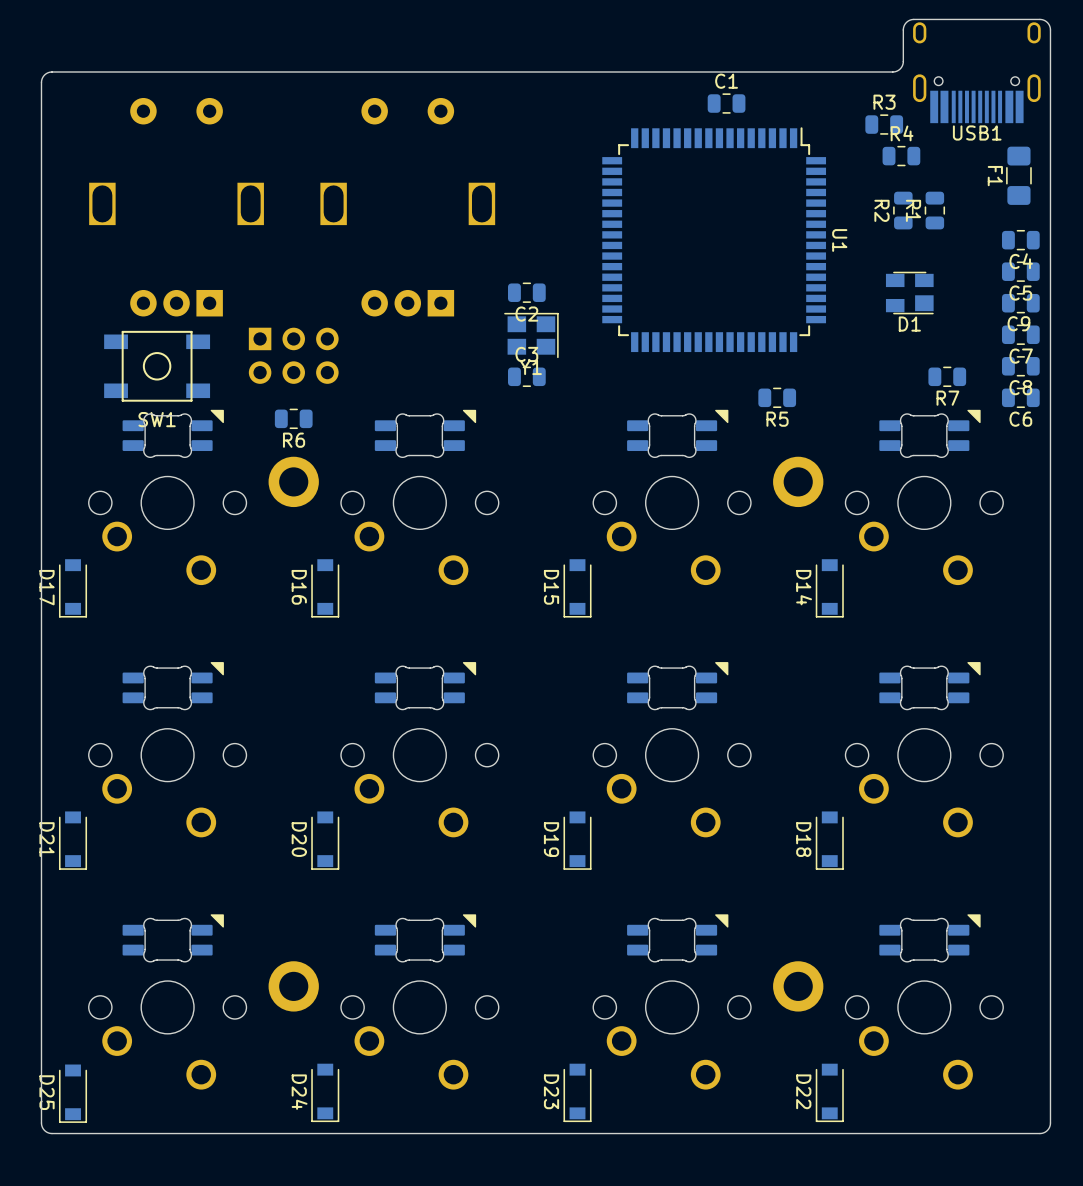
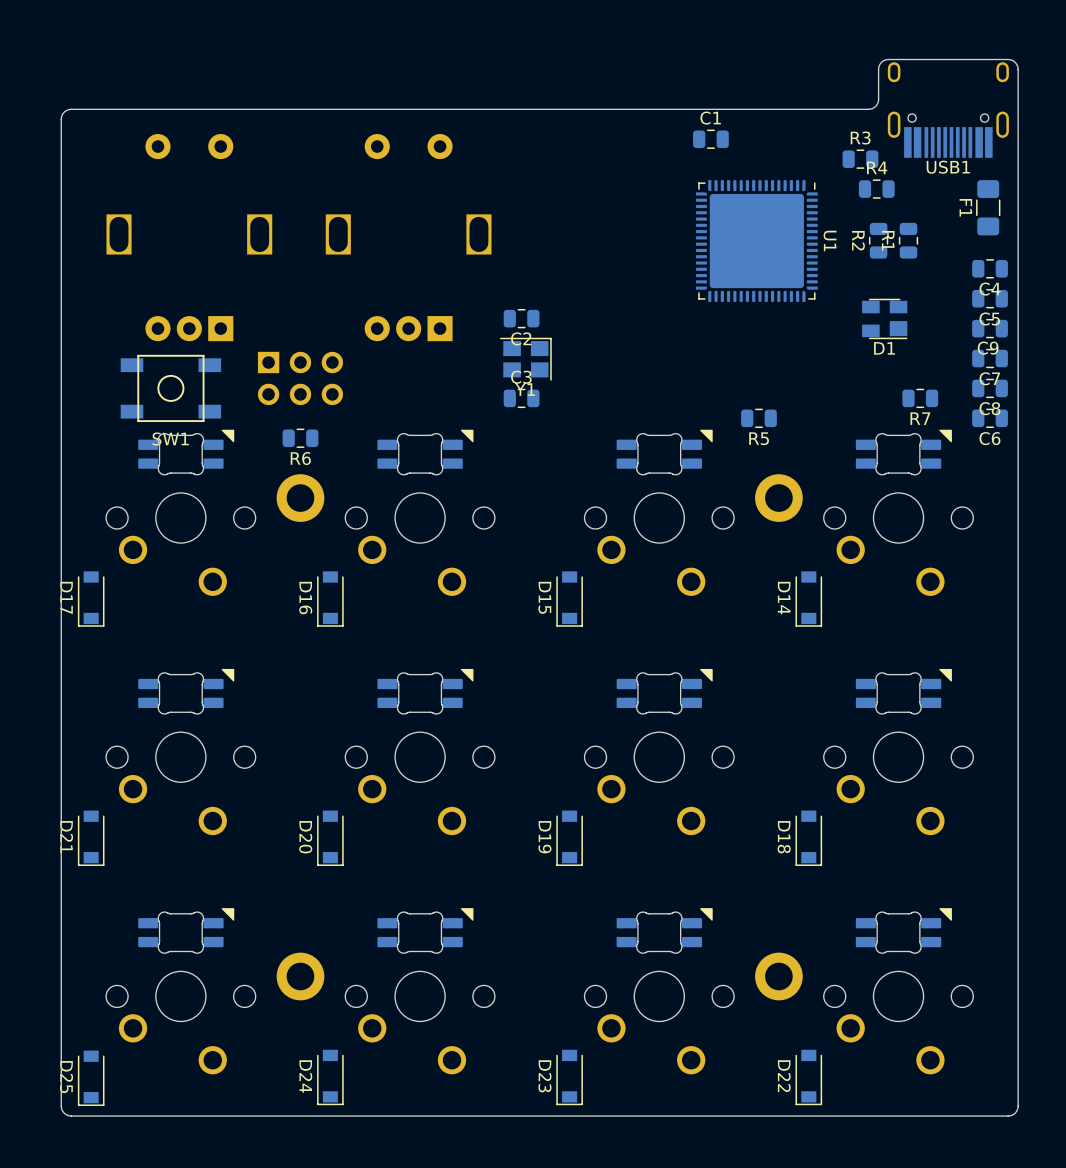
U1 footprint: [602, 127, 827, 353] -> [695, 180, 818, 302]
U1 name position: U1 (839, 240) -> U1 (830, 240)

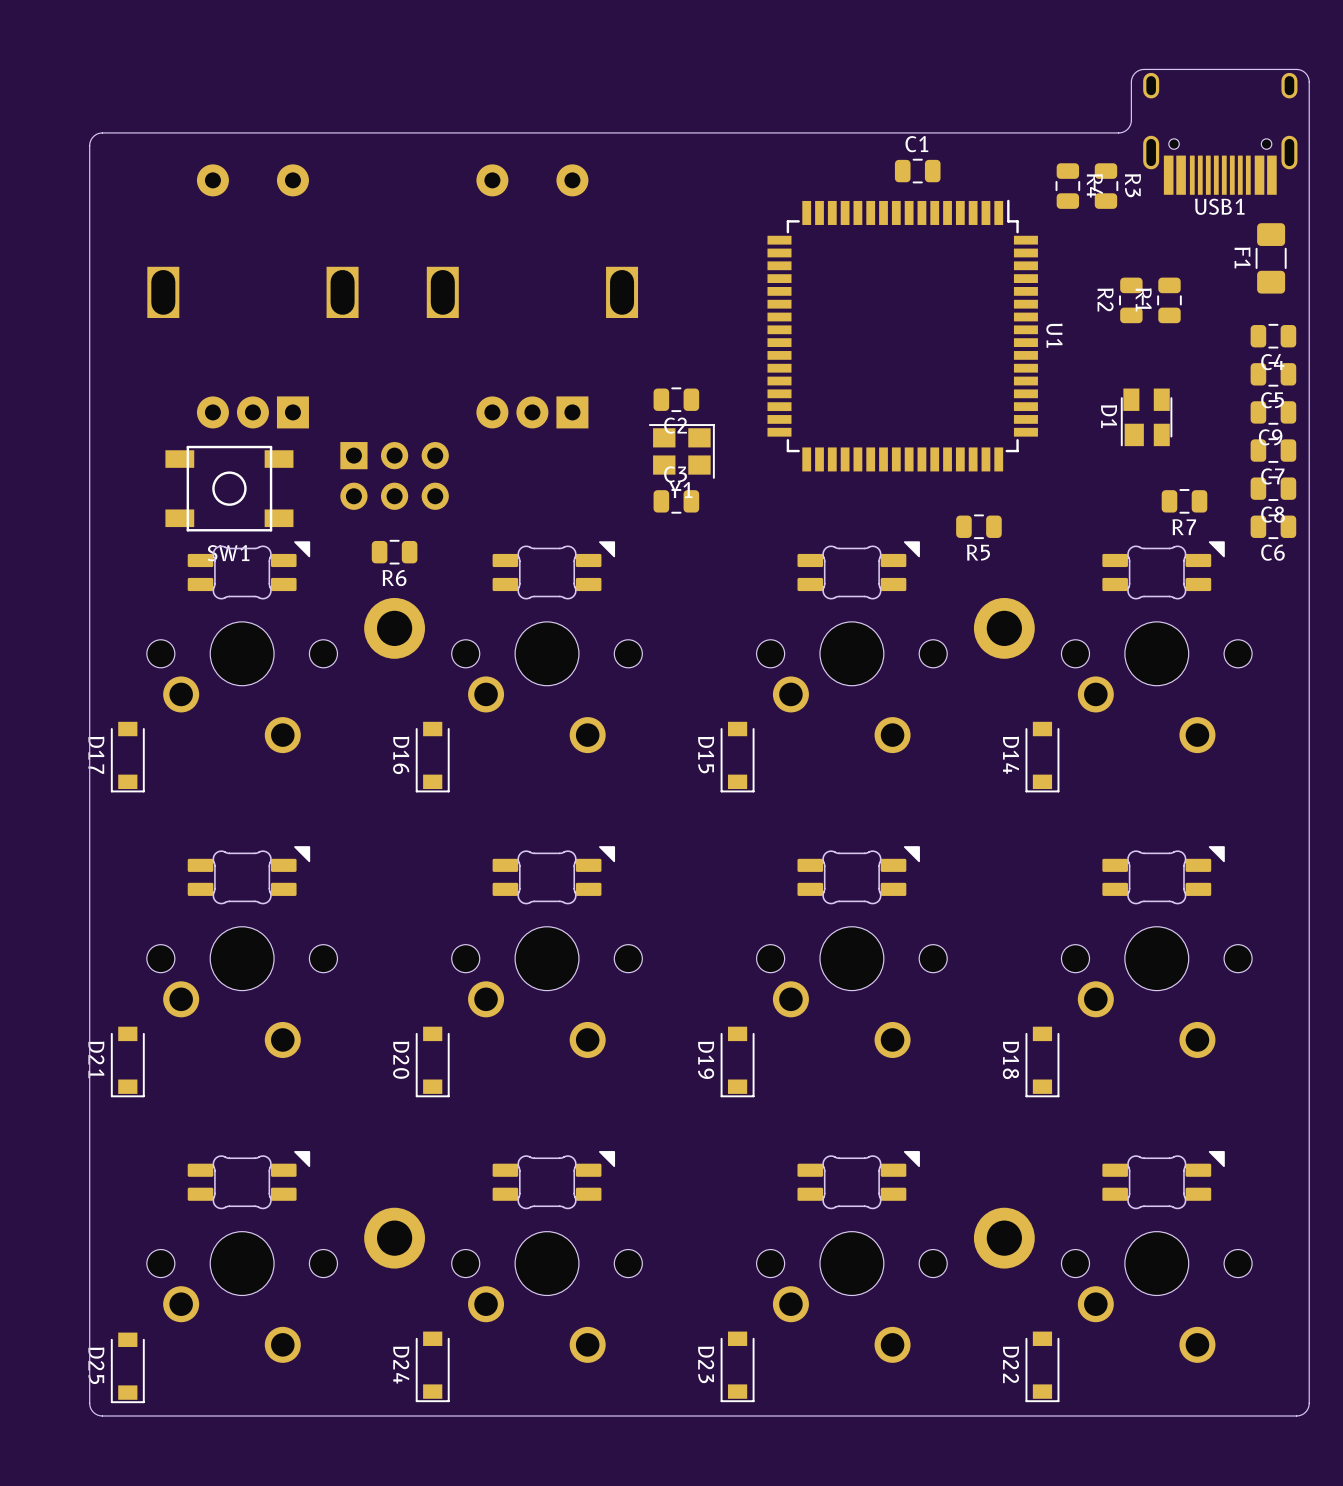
R3 rotation: 0° (860, 159) -> 90° clockwise (1105, 186)
U1 footprint: [695, 180, 818, 302] -> [767, 199, 1038, 472]
R4 rotation: 0° (876, 189) -> 90° clockwise (1067, 186)
R4 position: (876, 189) -> (1067, 186)
U1 name position: U1 (830, 240) -> U1 (1054, 335)
D1 rotation: 0° (884, 318) -> 90° clockwise (1146, 417)

